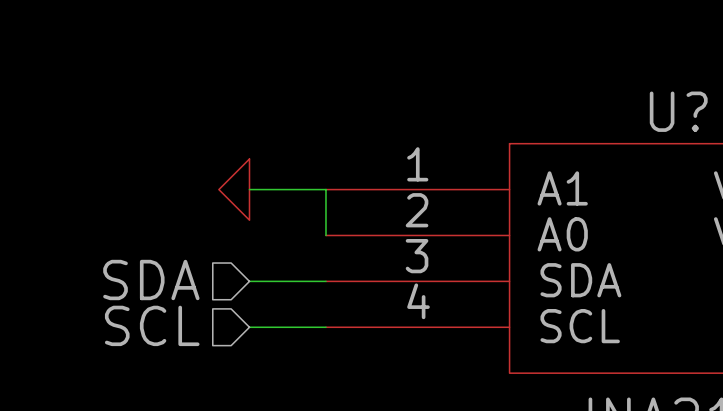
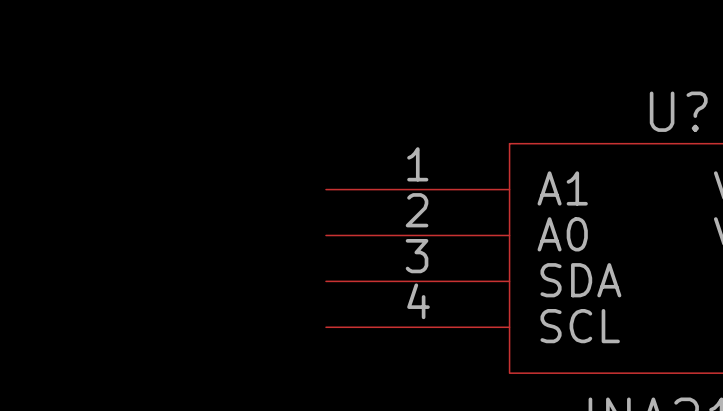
power symbol: (234, 189) -> none
wire: (249, 189) (325, 189) (325, 235) -> none
hierarchical label: SDA (151, 280) -> none
wire: (249, 281) (325, 281) -> none
hierarchical label: SCL (152, 325) -> none
wire: (249, 327) (325, 327) -> none

